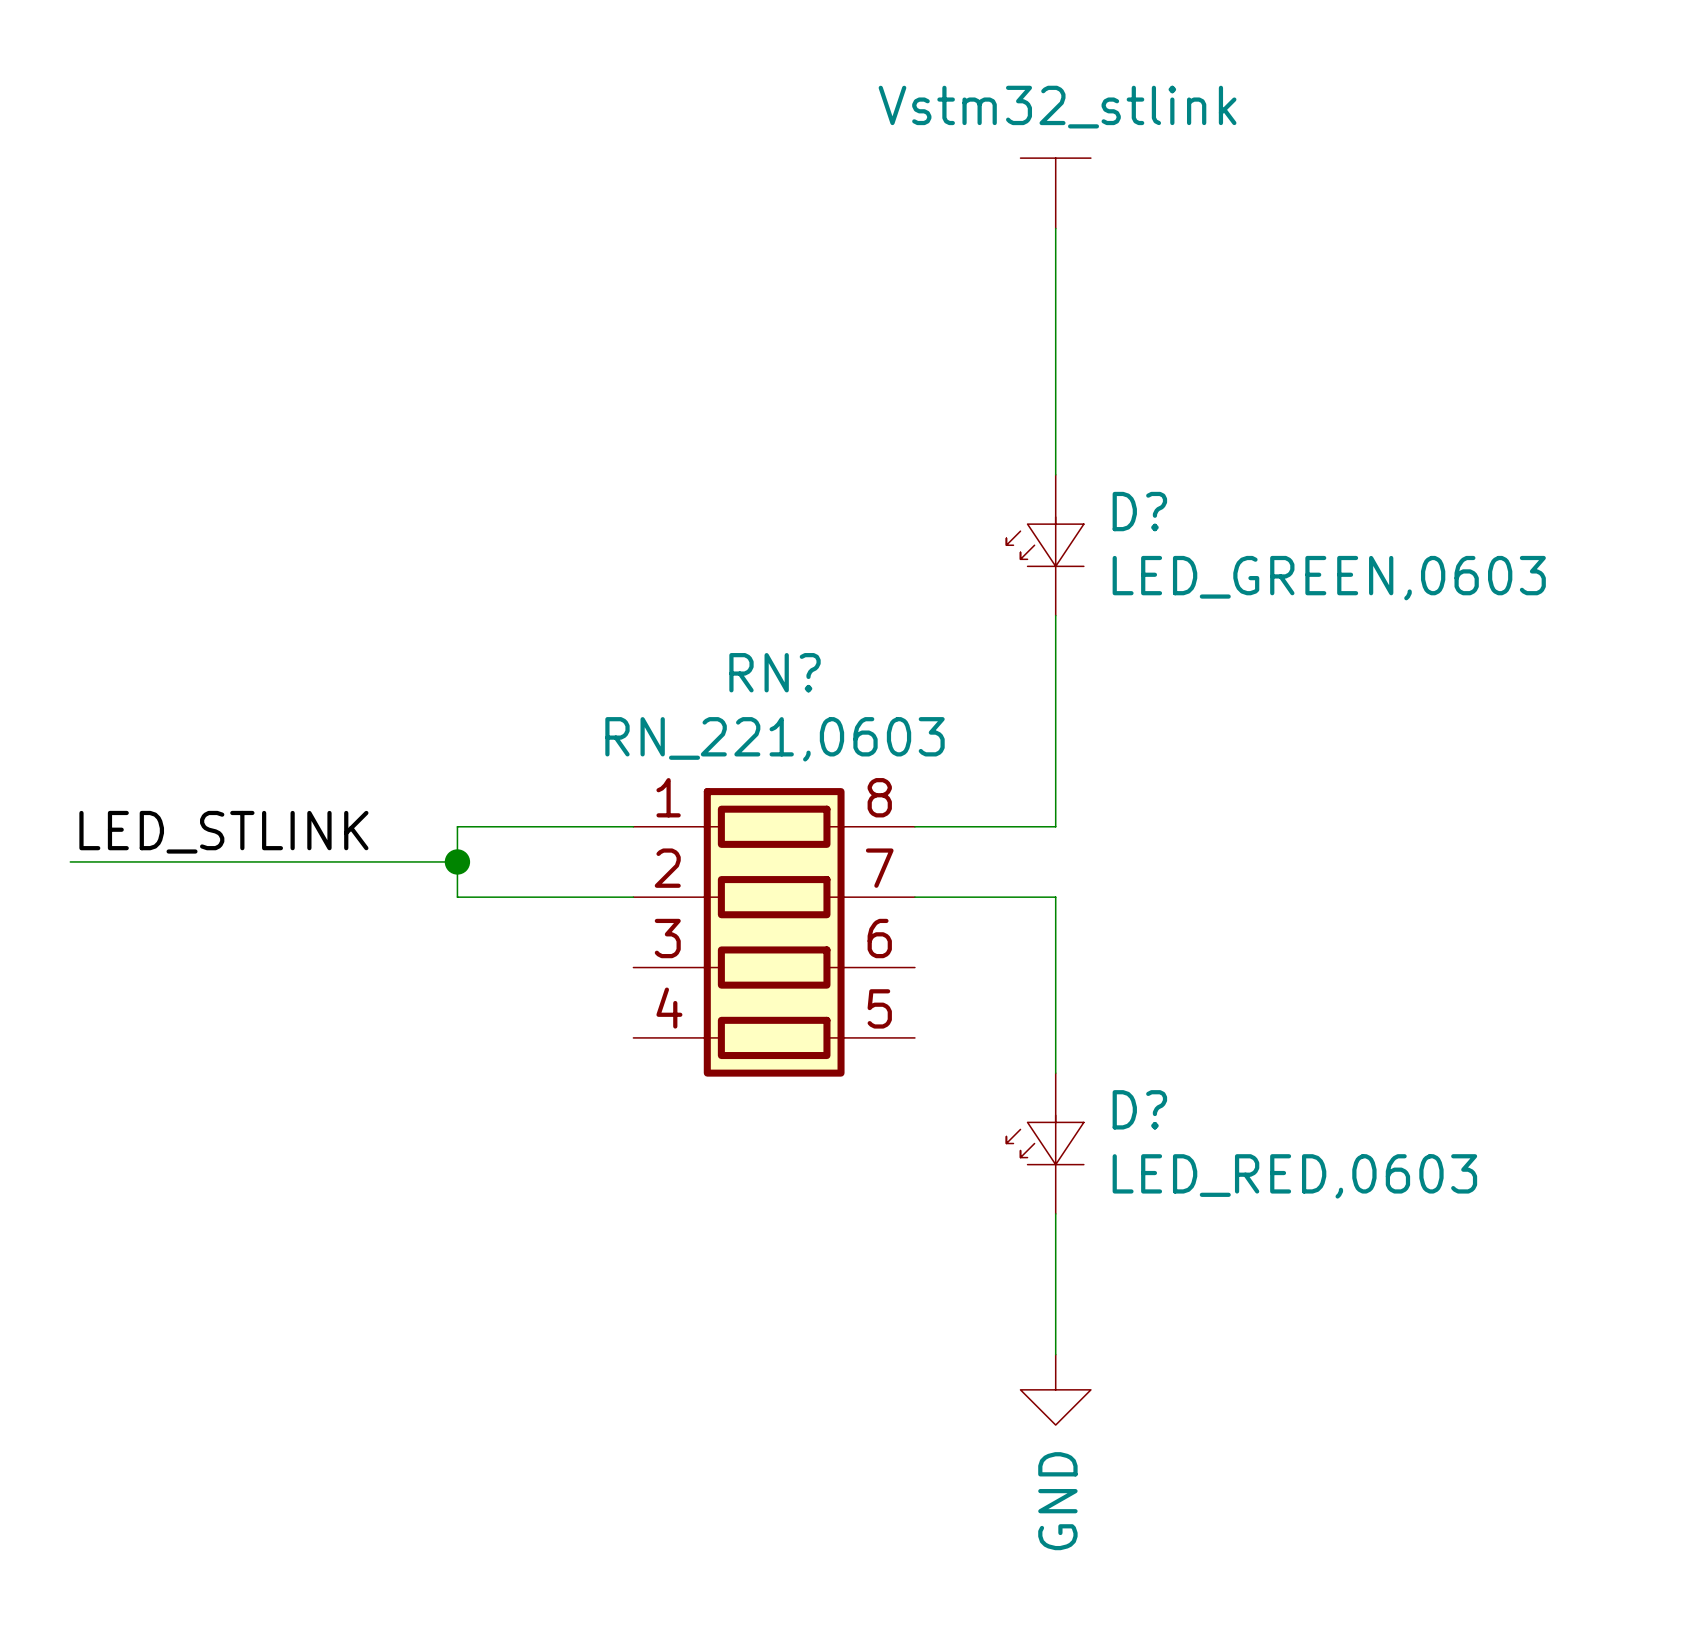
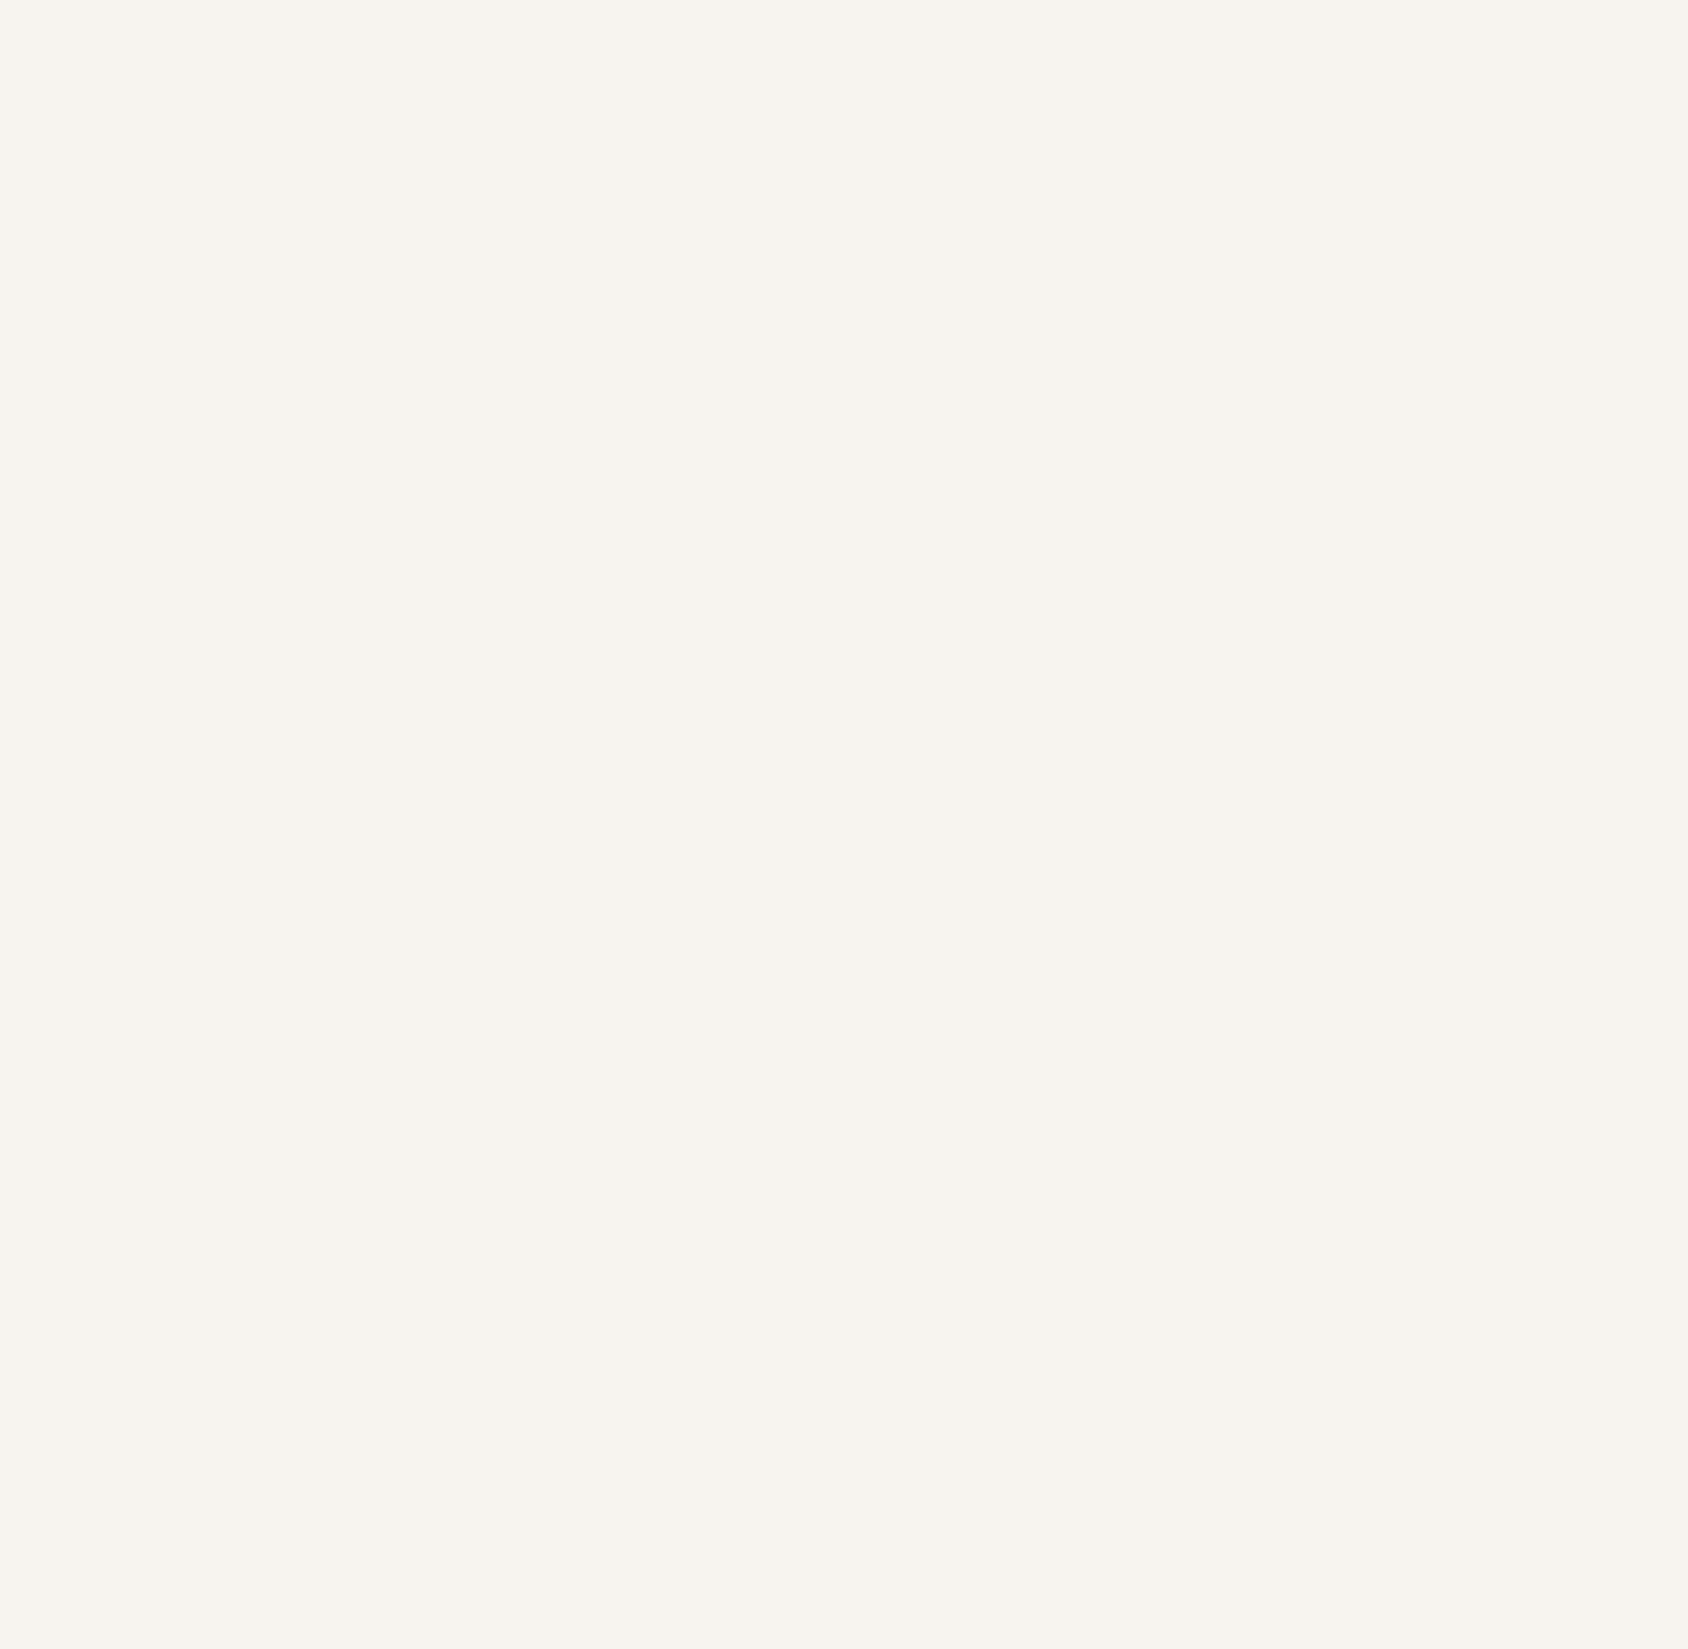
power symbol: Vstm32_stlink (1055, 193) -> none
wire: (1055, 228) (1055, 474) -> none
D?: LED_GREEN,0603 (1045, 545) -> none
wire: (1055, 615) (1055, 826) (914, 826) -> none
wire: (633, 826) (457, 826) (457, 897) (633, 897) -> none
label: LED_STLINK (223, 832) -> none
wire: (70, 861) (457, 861) -> none
junction: (457, 861) -> none
wire: (914, 897) (1055, 897) (1055, 1073) -> none
RN?: RN_221,0603 (774, 932) -> none
D?: LED_RED,0603 (1045, 1143) -> none
wire: (1055, 1213) (1055, 1354) -> none
power symbol: GND (1055, 1389) -> none

